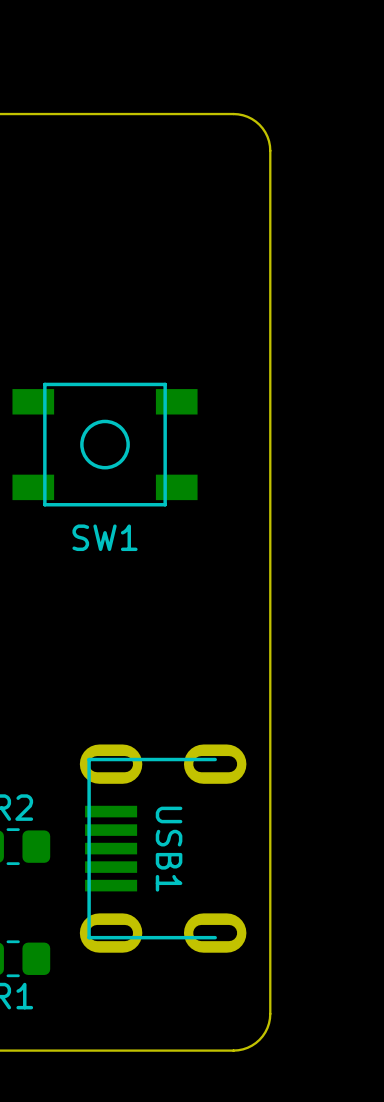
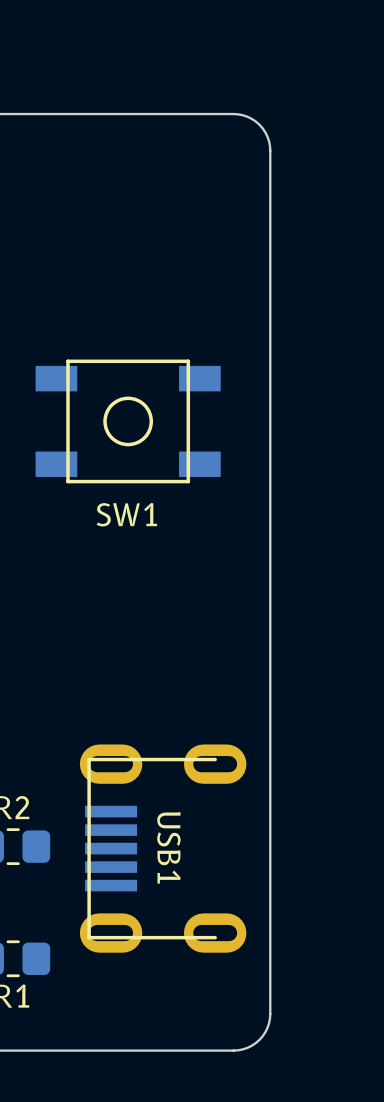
SW1 position: (105, 444) -> (128, 421)

